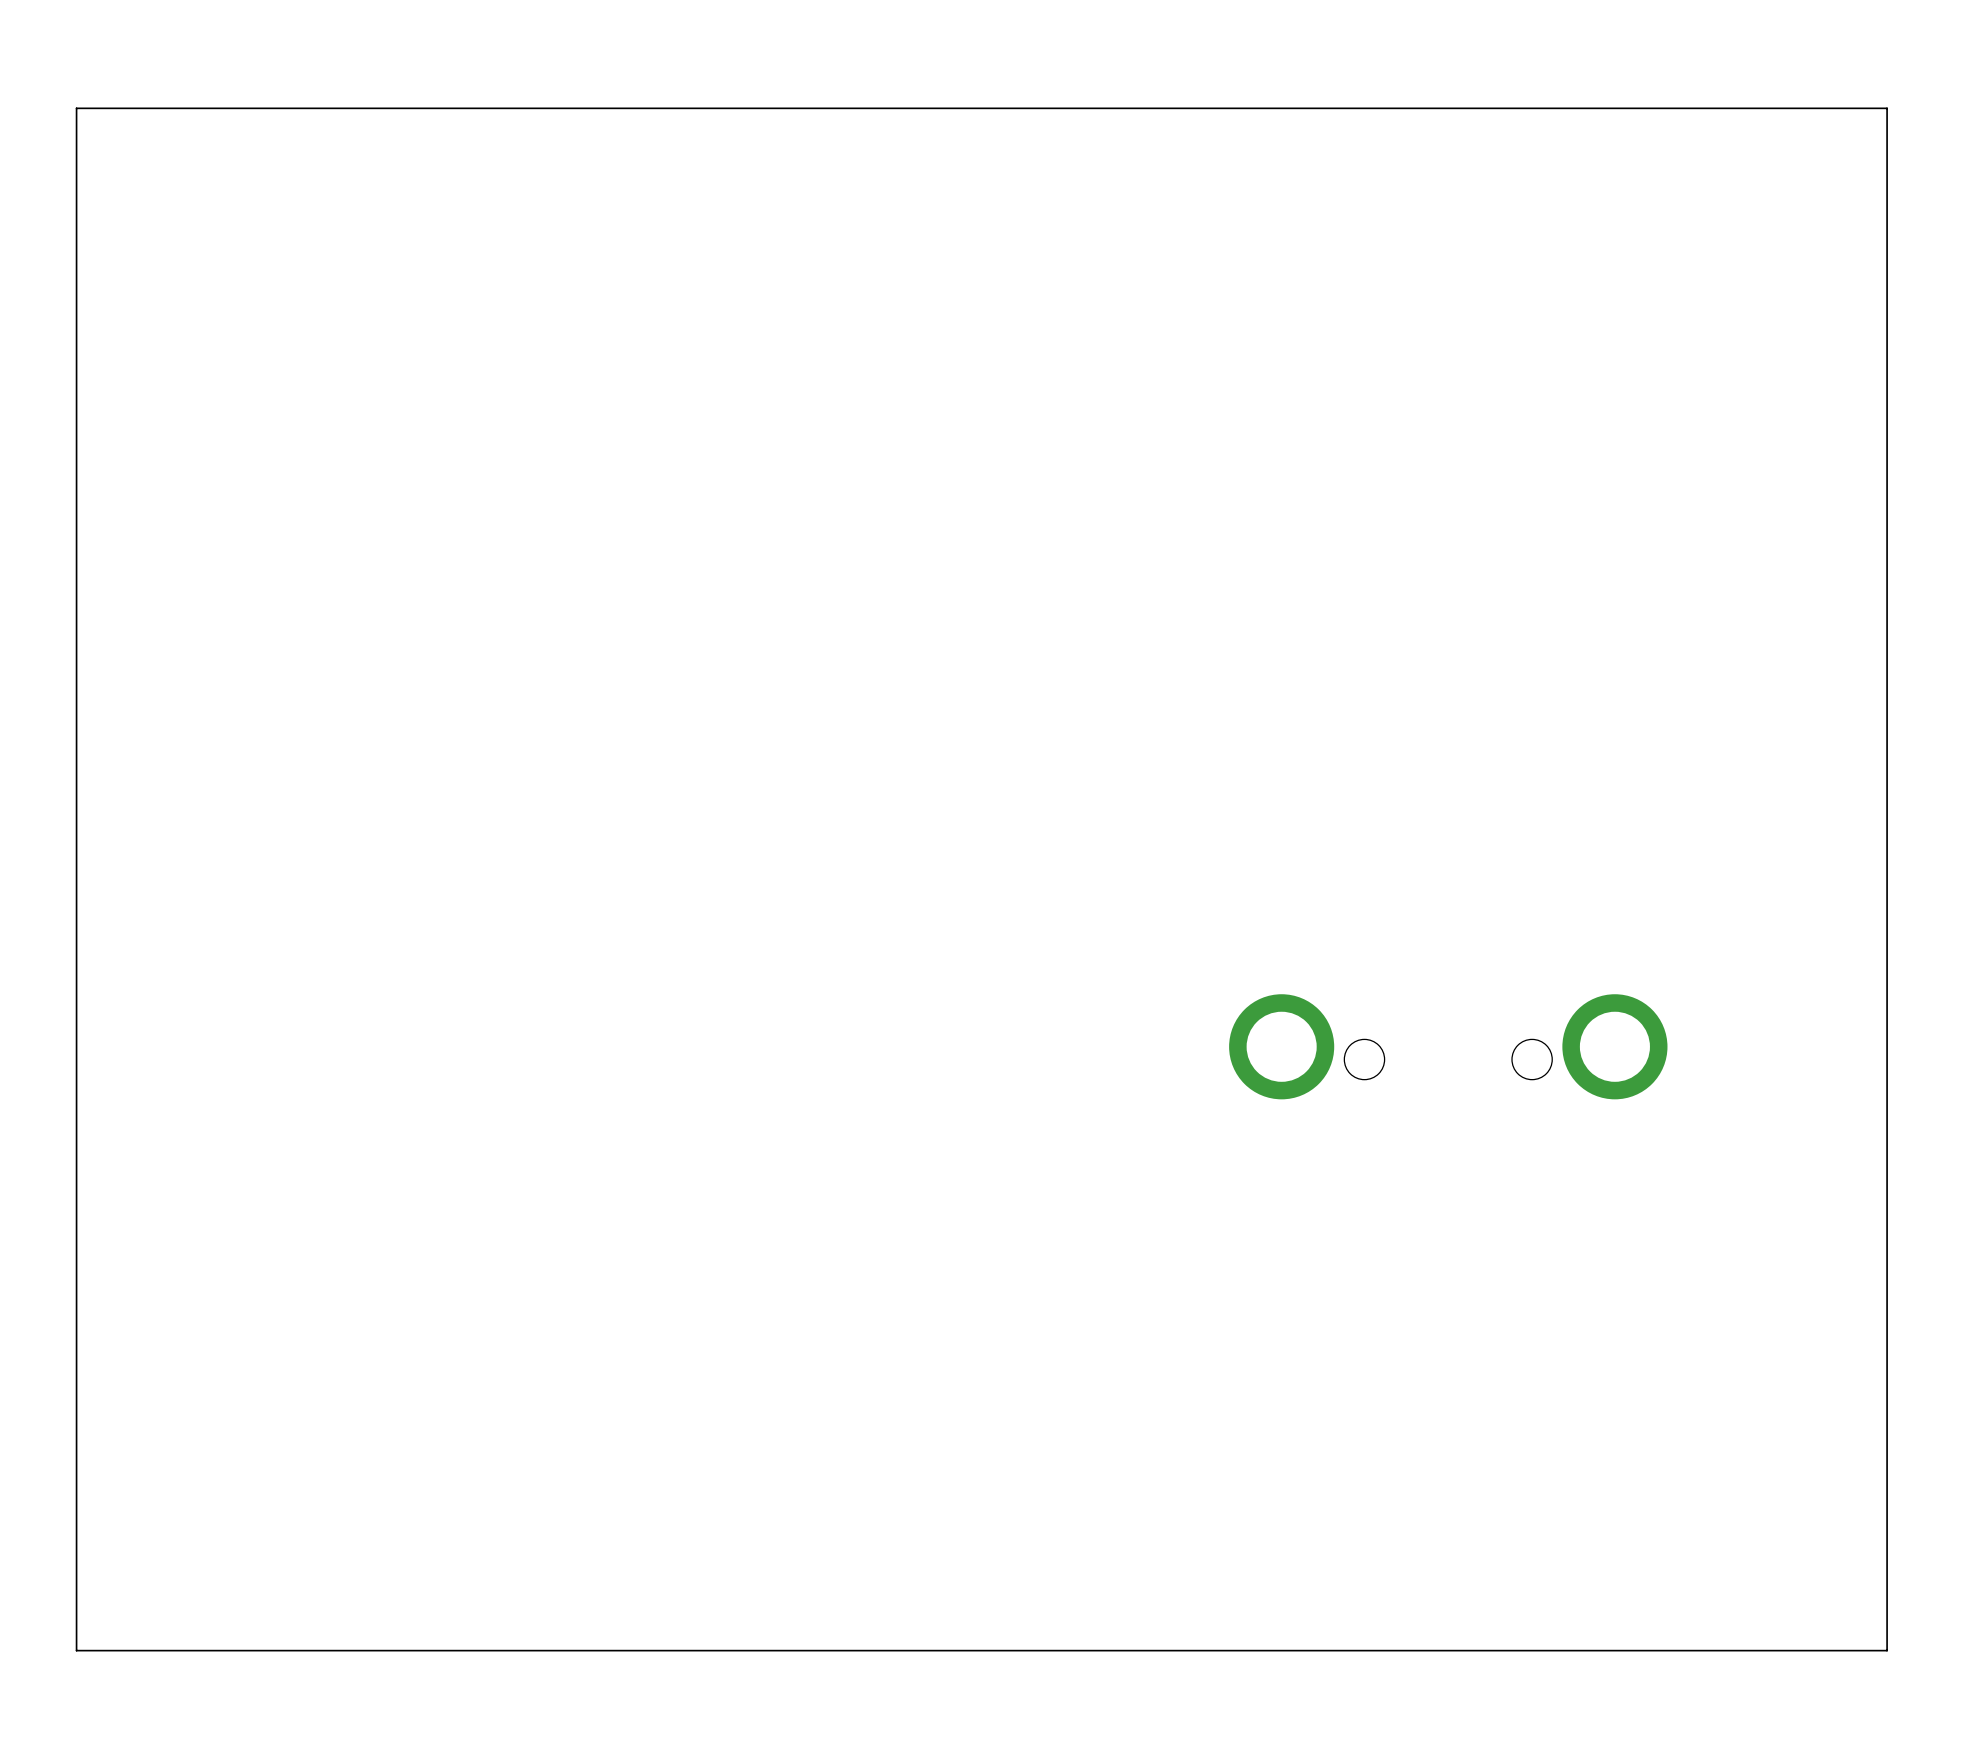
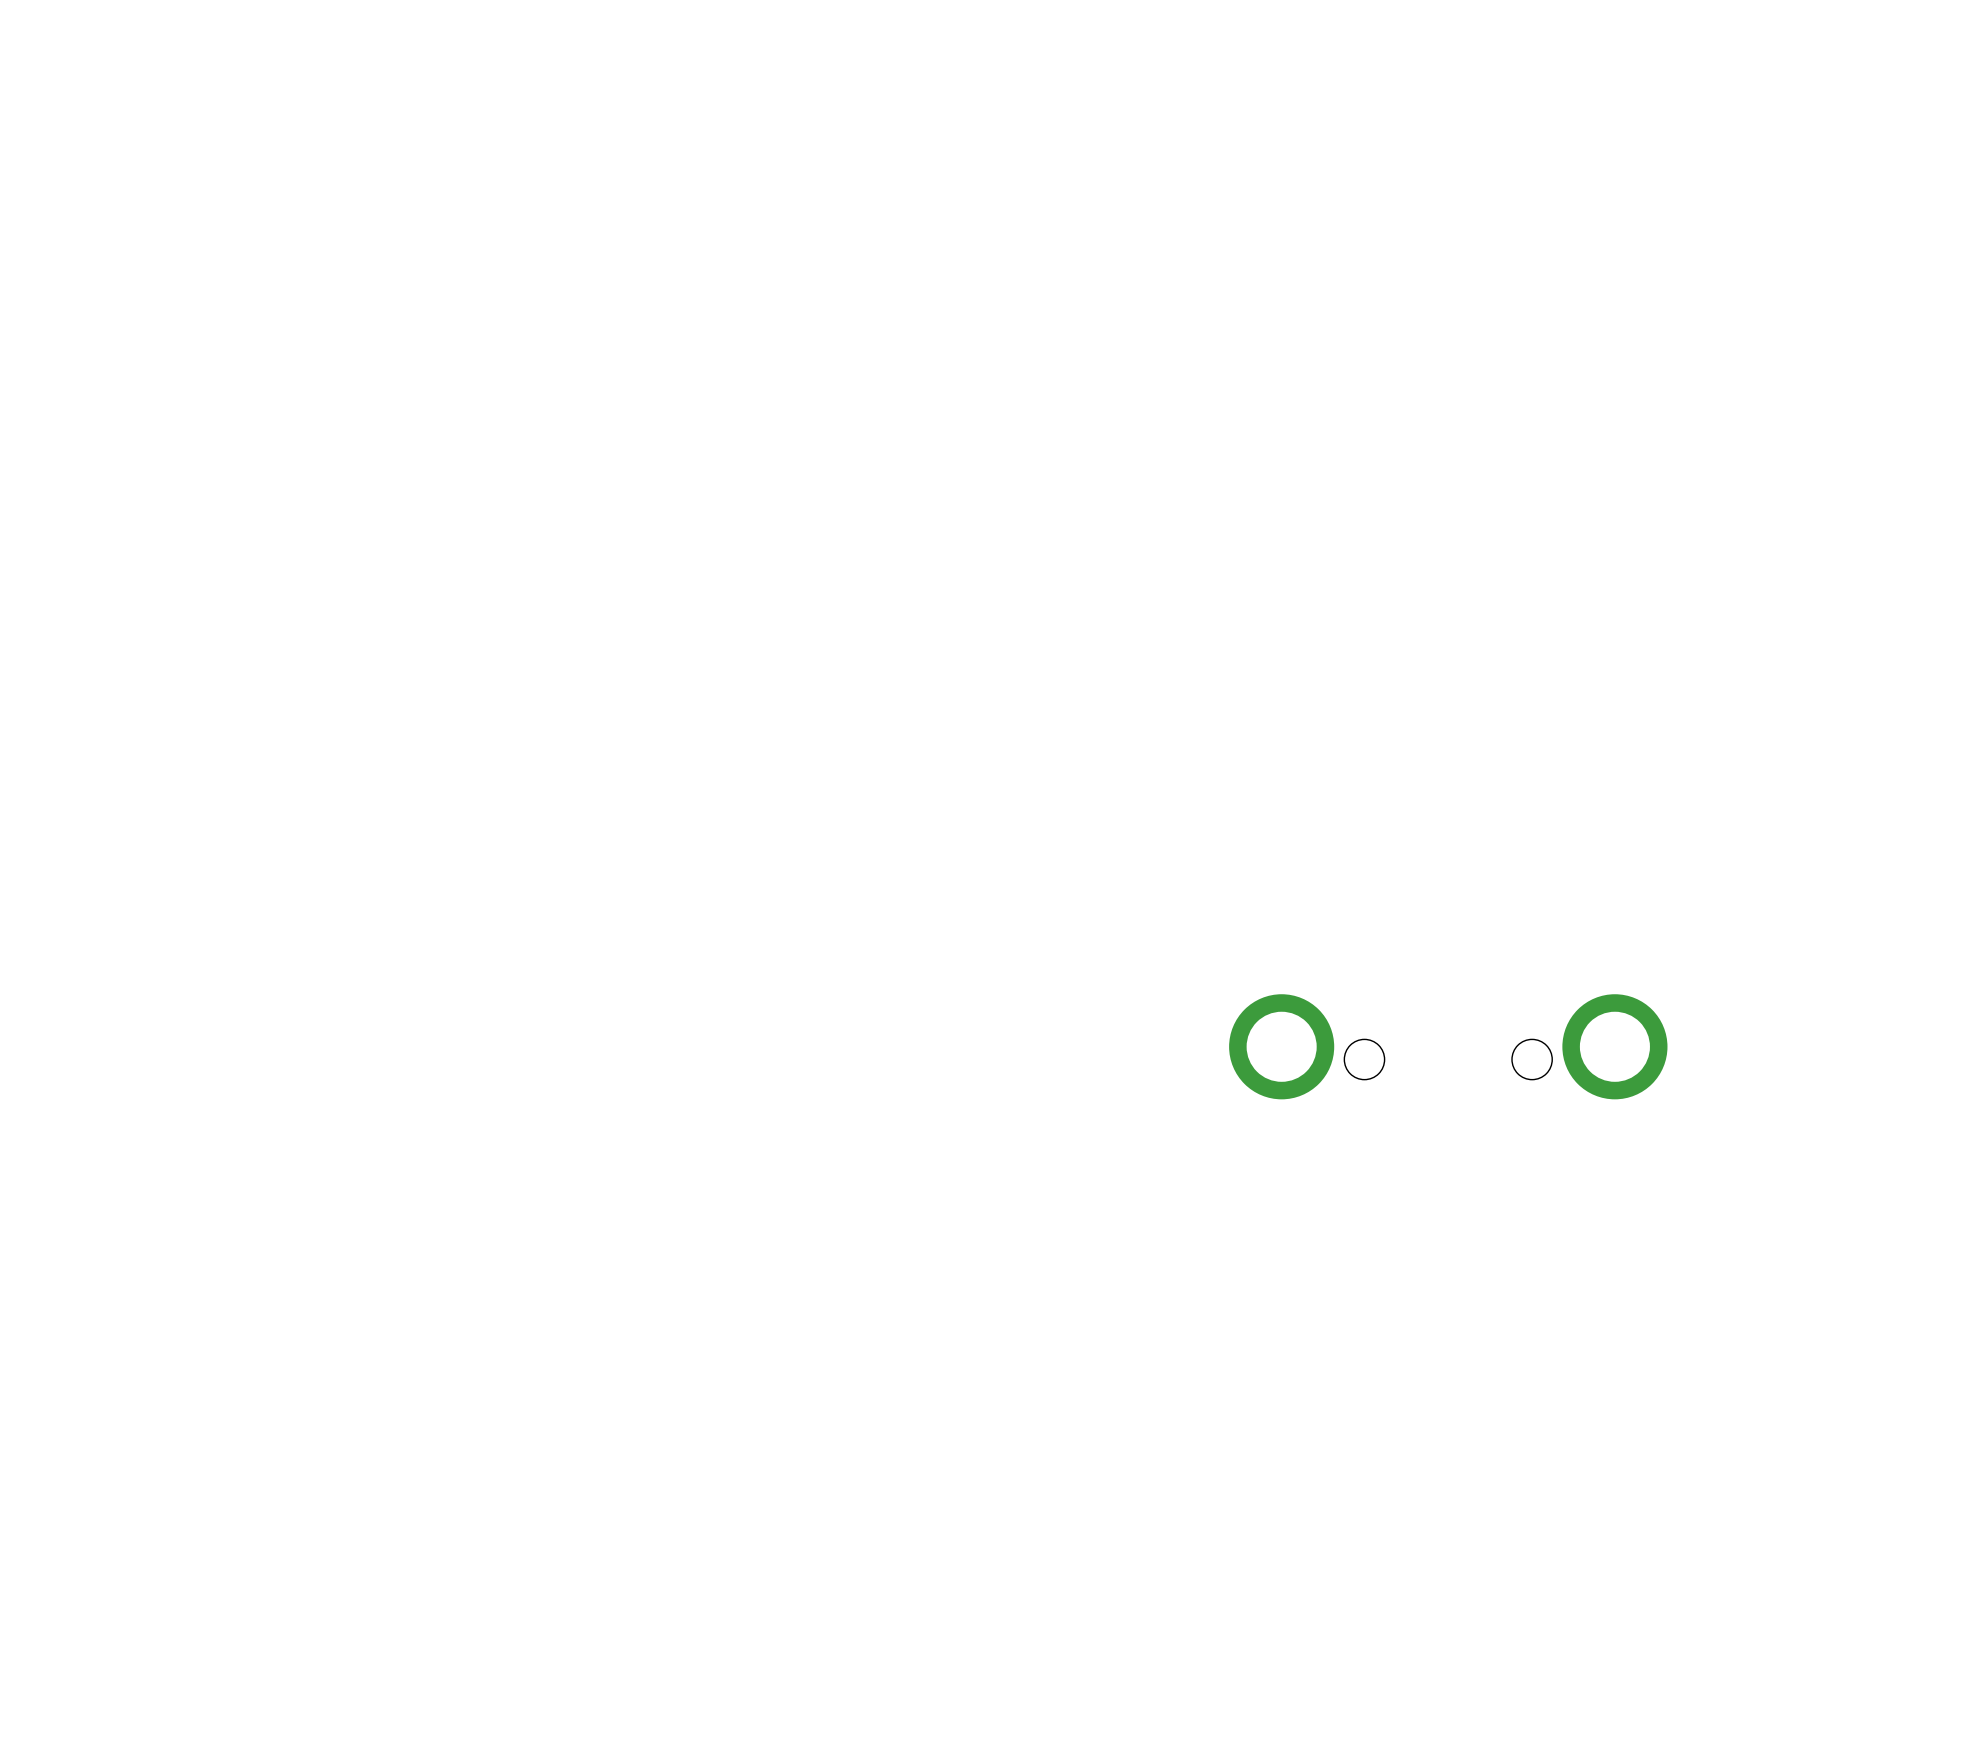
board edge: (1887, 108) (76, 108) (76, 1650) (1887, 1650) (1887, 108) -> none

